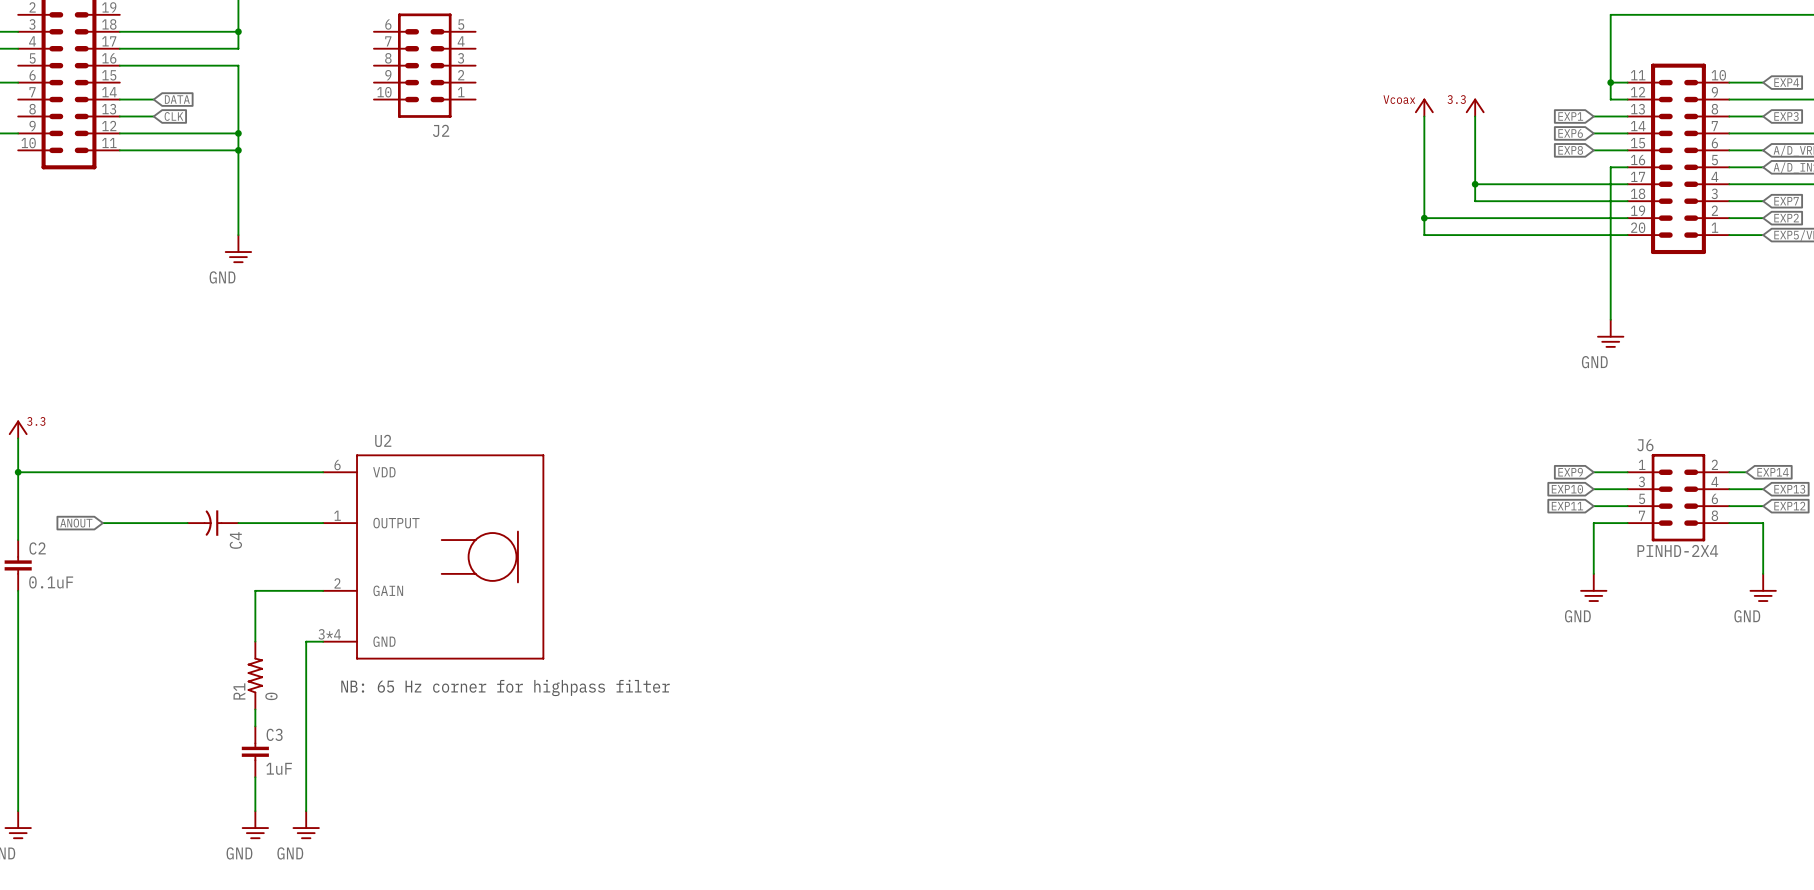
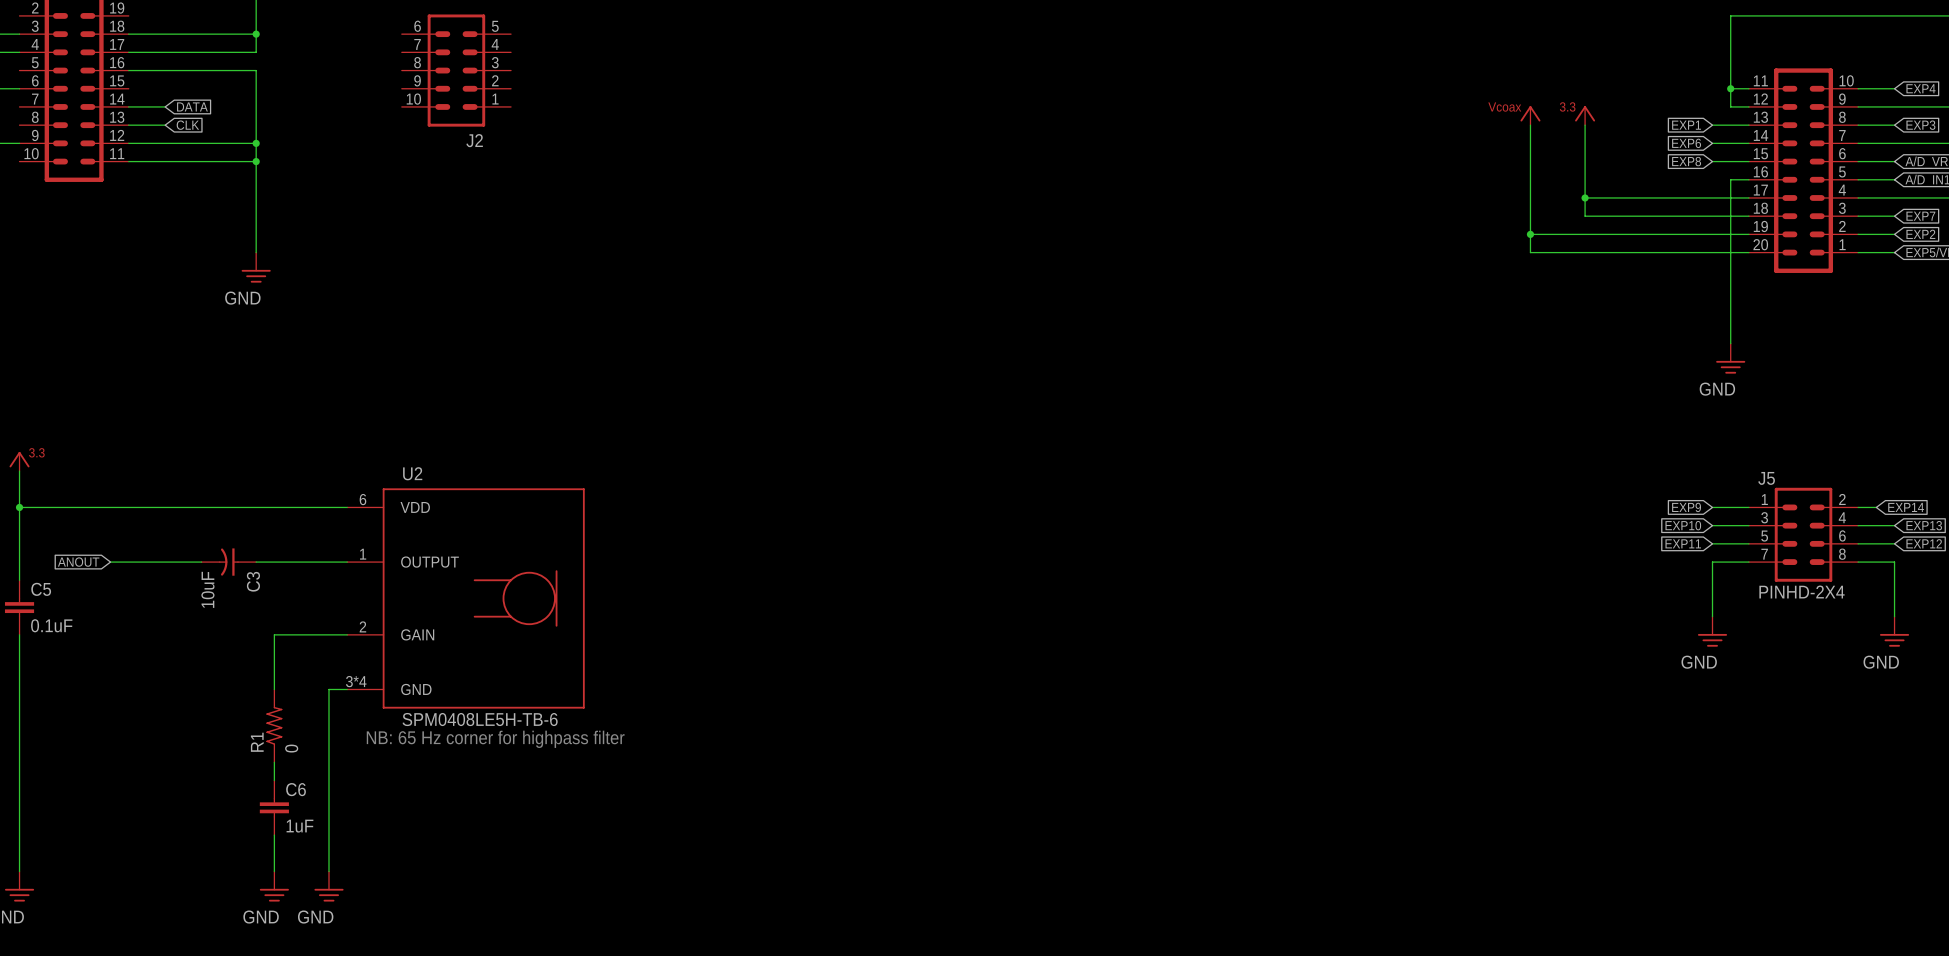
J6 name: J6 (1645, 445) -> J5 (1766, 478)
C4 name: C4 (235, 540) -> C3 (253, 581)
C2 name: C2 (37, 548) -> C5 (41, 589)
C4 value: none -> 10uF (207, 589)
U2 value: none -> SPM0408LE5H-TB-6 (480, 719)
C3 name: C3 (274, 734) -> C6 (296, 789)

